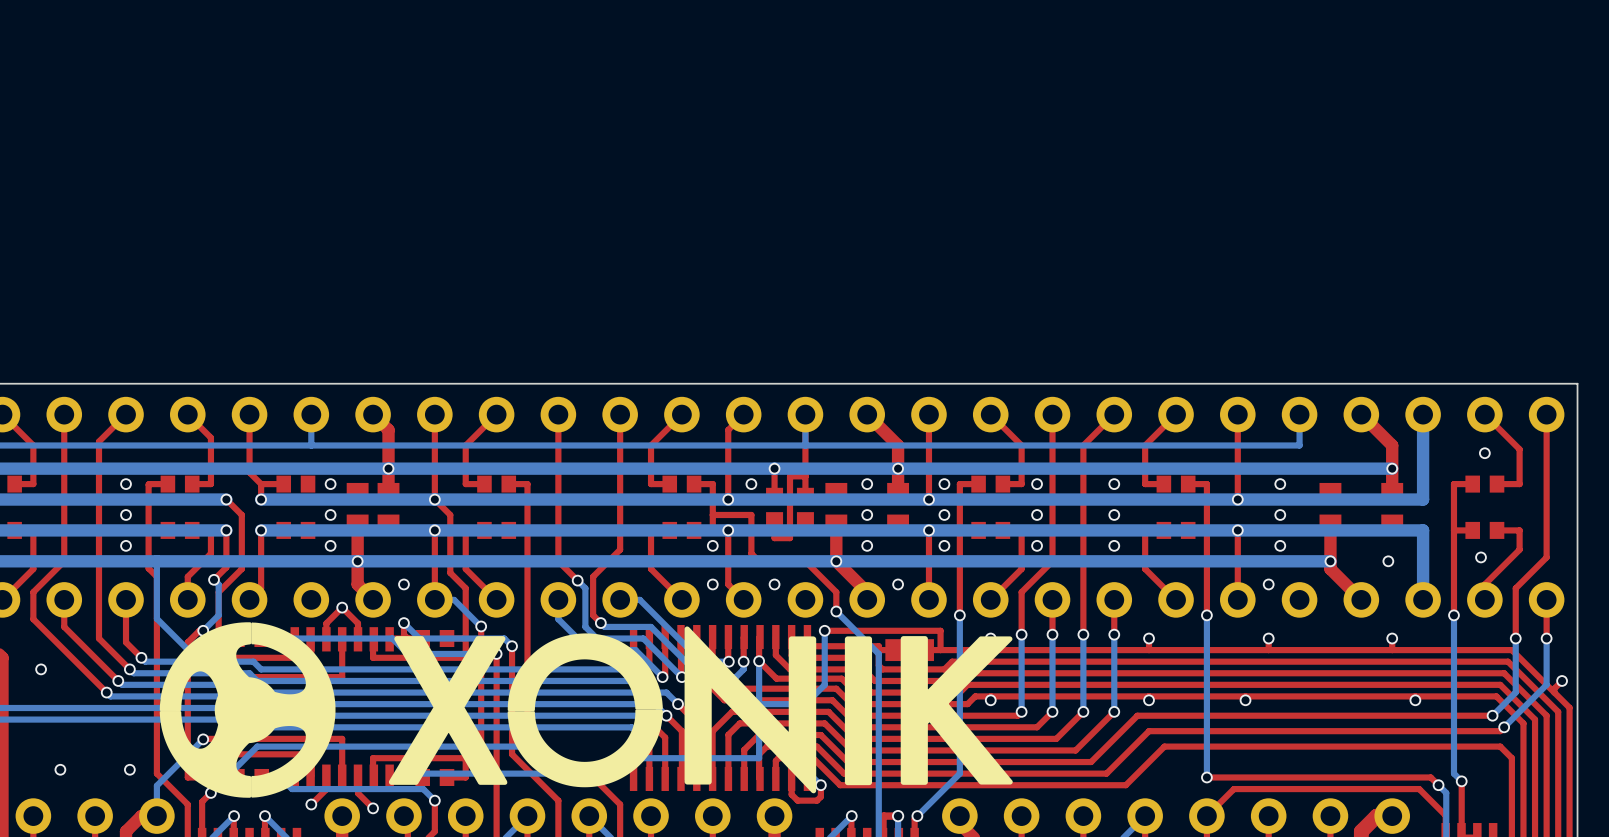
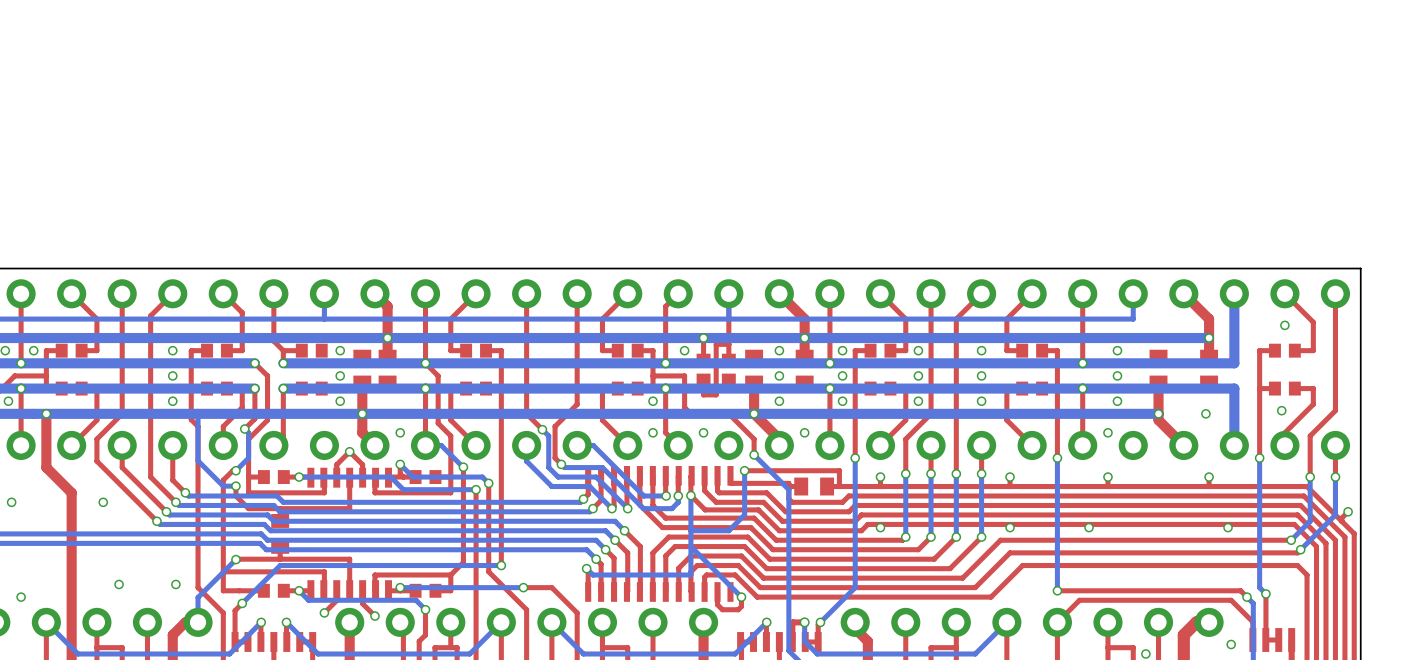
drawing: [159, 622, 1013, 798] -> none

